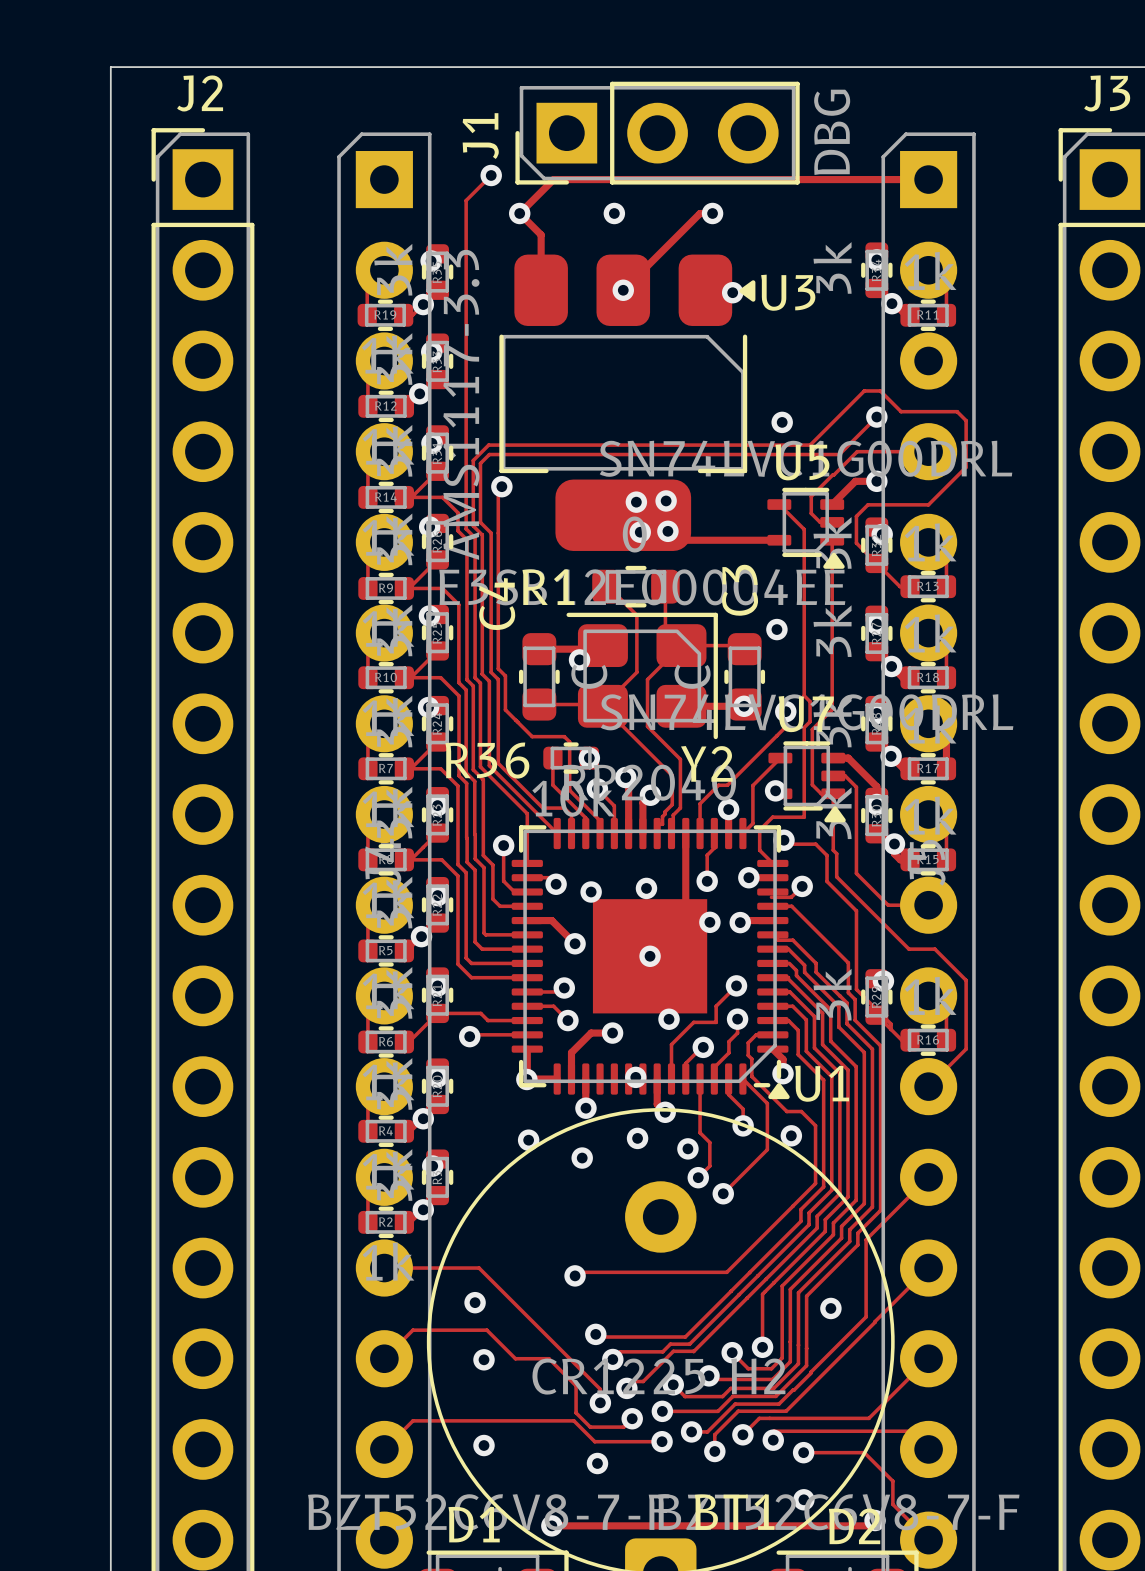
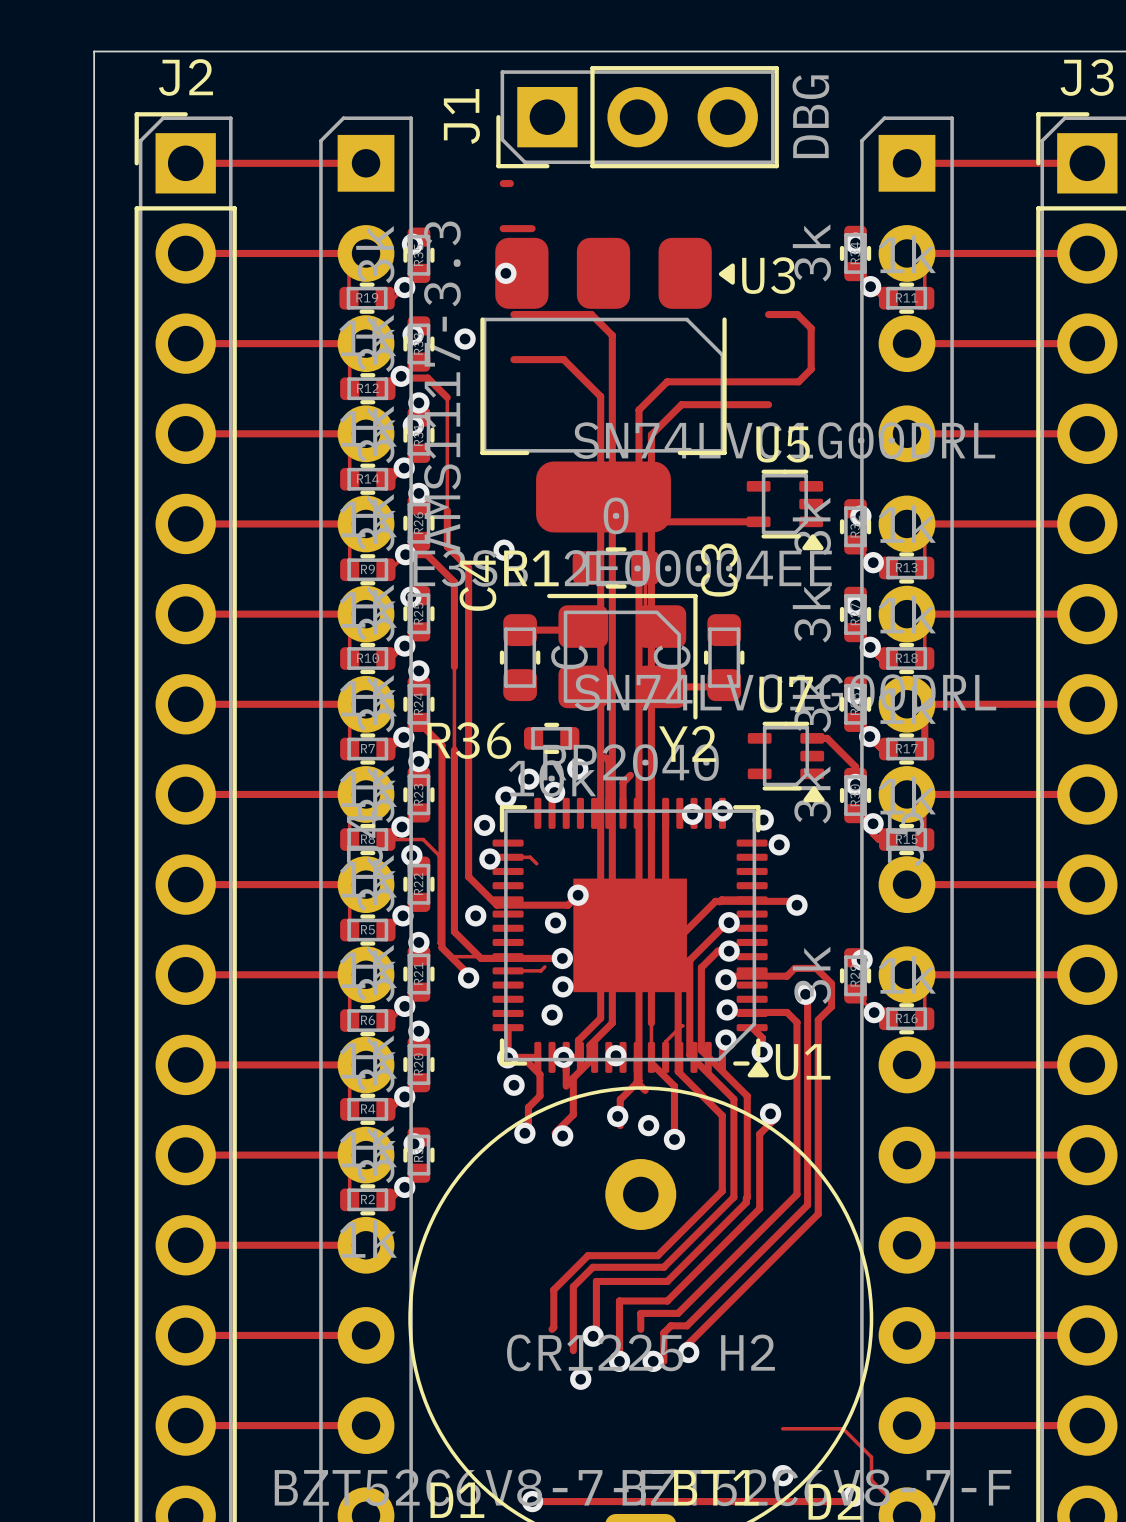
track: (491, 175) (466, 200) (466, 415) -> (402, 378) (427, 378) (447, 397)
via: (491, 175) -> none
track: none -> (185, 163) (366, 163)
track: (928, 179) (553, 179) (519, 213) (541, 234) (541, 290) -> (907, 163) (1087, 163)
track: none -> (503, 183) (510, 183)
via: (519, 213) -> none
via: (614, 213) -> none
track: (712, 213) (700, 213) (623, 290) -> none
via: (712, 213) -> none
track: none -> (503, 228) (532, 228)
track: none -> (185, 253) (366, 253)
track: none -> (907, 253) (1087, 253)
via: none -> (505, 273)
via: (623, 290) -> none
via: (732, 292) -> none
track: none -> (513, 314) (591, 314) (612, 335) (612, 1023) (590, 1045) (590, 1061) (573, 1077) (573, 1114) (555, 1133)
track: none -> (768, 314) (797, 314) (811, 328) (811, 369) (798, 381) (667, 381) (639, 410) (639, 1080) (620, 1099) (620, 1125)
via: none -> (465, 339)
track: none -> (185, 343) (366, 343)
track: none -> (907, 343) (1087, 343)
track: none -> (513, 359) (563, 359) (600, 396) (600, 1018) (578, 1040) (578, 1056) (563, 1057)
track: (876, 417) (839, 454) (489, 454) (480, 463) (480, 522) (491, 533) (491, 672) (498, 679) (498, 763) (542, 808) (564, 808) (571, 815) (571, 833) -> none
via: (876, 417) -> none
via: none -> (418, 402)
via: (782, 422) -> none
track: none -> (185, 433) (366, 433)
track: (928, 451) (857, 451) (811, 496) (811, 513) (820, 522) (832, 522) -> (907, 433) (1087, 433)
track: (876, 481) (855, 481) (832, 504) -> none
via: (876, 481) -> none
via: none -> (404, 468)
track: (501, 486) (498, 490) (498, 668) (505, 675) (505, 709) (532, 736) (564, 736) (569, 741) (569, 790) (600, 820) (600, 833) -> none
via: (501, 486) -> none
track: (411, 497) (442, 497) (457, 512) (457, 530) (466, 539) (466, 679) (473, 686) -> (405, 554) (426, 554) (454, 582) (454, 666)
via: (666, 500) -> none
via: (636, 502) -> none
track: (779, 504) (804, 529) (804, 695) (810, 701) (810, 721) (804, 727) (804, 817) (772, 817) (759, 830) (759, 850) (772, 863) -> none
via position: (429, 527) -> (418, 493)
track: (466, 528) (475, 537) (475, 677) (480, 683) (480, 766) (527, 813) (527, 863) -> (447, 510) (447, 546) (468, 567) (468, 876) (496, 905) (568, 905) (578, 895)
via: (667, 531) -> none
via: (640, 532) -> none
track: (832, 540) (832, 709) (812, 729) (812, 784) (821, 793) (833, 793) (833, 850) (836, 853) (836, 876) (908, 949) (934, 949) (966, 980) (966, 1049) (928, 1086) -> (1087, 1064) (907, 1064)
track: none -> (185, 523) (366, 523)
track: none -> (907, 523) (1087, 523)
track: (876, 563) (856, 543) (856, 516) (867, 504) (928, 504) (966, 467) (966, 420) (957, 411) (901, 411) (880, 390) (864, 390) (810, 445) (488, 445) (473, 460) (473, 525) (482, 534) (482, 674) (489, 681) (489, 765) (557, 833) -> none
via: none -> (504, 550)
via: none -> (405, 554)
via: none -> (873, 562)
track: (606, 584) (636, 615) (636, 672) (602, 706) -> none
track: (409, 588) (442, 588) (458, 604) (458, 682) (466, 689) (466, 772) (474, 781) (474, 834) -> none
via: (776, 629) -> none
track: none -> (185, 614) (366, 614)
track: none -> (907, 614) (1087, 614)
track: (744, 649) (741, 645) (681, 645) (647, 679) (647, 726) (680, 759) (680, 808) (673, 815) (673, 831) (671, 833) -> none
via: (579, 659) -> none
via: none -> (404, 646)
track: (410, 677) (440, 677) (459, 695) (459, 775) (466, 783) (466, 837) -> none
track: (539, 704) (601, 704) (672, 775) (672, 804) (662, 816) (662, 824) (657, 824) (657, 833) -> none
via: (744, 706) -> none
via position: (428, 707) -> (418, 670)
track: (785, 711) (785, 726) (727, 785) (718, 785) (700, 803) (700, 833) -> none
via: (785, 711) -> none
track: none -> (185, 704) (366, 704)
track: none -> (907, 704) (1087, 704)
track: none -> (418, 722) (441, 745) (441, 947) (468, 974) (468, 977)
via: none -> (403, 737)
track: (552, 758) (552, 785) (585, 817) (585, 833) -> none
via: (589, 758) -> none
track: (780, 758) (752, 785) (752, 823) (742, 833) -> none
track: (410, 768) (440, 768) (457, 785) (457, 864) (466, 872) (466, 958) (471, 963) (527, 963) -> none
track: (473, 769) (483, 779) (483, 855) (492, 865) (492, 899) (500, 906) (527, 906) -> (454, 750) (454, 931) (481, 958) (562, 958)
track: (833, 775) (845, 775) (856, 787) (856, 873) (888, 905) (928, 905) -> (1087, 884) (907, 884)
via: (625, 777) -> none
via: none -> (418, 761)
track: (597, 788) (614, 805) (614, 833) -> none
via: (775, 790) -> none
via: (650, 795) -> none
via: none -> (528, 779)
via: (437, 805) -> none
via: (728, 809) -> none
via: none -> (554, 792)
track: none -> (185, 794) (366, 794)
track: none -> (907, 794) (1087, 794)
via: none -> (505, 796)
via: none -> (722, 810)
track: (714, 833) (714, 848) (707, 855) (707, 881) -> none
track: (475, 834) (475, 858) (484, 867) (484, 933) (485, 934) (527, 934) -> none
via: none -> (692, 814)
track: (467, 838) (467, 862) (475, 870) (475, 941) (482, 949) (527, 949) -> none
track: (783, 840) (789, 844) (815, 844) (827, 855) (827, 881) (856, 910) (856, 989) (891, 1024) (891, 1029) -> none
track: (503, 845) (503, 881) (514, 892) (527, 892) -> none
via: none -> (401, 827)
via: (748, 877) -> none
via: none -> (489, 859)
via: (707, 881) -> none
via: (556, 884) -> none
track: (802, 886) (791, 897) (771, 897) -> none
via position: (802, 886) -> (779, 844)
via: (646, 888) -> none
via position: (591, 892) -> (578, 895)
via position: (437, 895) -> (411, 855)
track: none -> (185, 884) (366, 884)
track: (772, 906) (791, 906) (848, 962) (848, 992) (855, 999) (855, 1020) (880, 1045) (880, 1210) (857, 1233) (857, 1244) (806, 1296) (806, 1365) (775, 1396) (732, 1396) (717, 1411) (662, 1411) -> none
track: (527, 920) (551, 920) (575, 943) -> none
via: (709, 922) -> none
via position: (740, 922) -> (729, 922)
track: none -> (796, 905) (793, 901) (715, 901) (679, 937) (678, 1071) (722, 1115) (722, 1191) (657, 1255) (588, 1255) (553, 1289) (553, 1327) (552, 1329)
via: none -> (796, 905)
track: (772, 934) (778, 940) (792, 940) (816, 963) (816, 972) (847, 1002) (847, 1023) (872, 1049) (872, 1207) (849, 1229) (849, 1241) (798, 1292) (798, 1363) (773, 1388) (730, 1388) (722, 1396) (685, 1396) (673, 1384) -> none
via: none -> (475, 915)
track: none -> (729, 922) (689, 960) (689, 1055) (733, 1099) (733, 1197) (663, 1267) (592, 1267) (573, 1286) (573, 1350)
track: (772, 949) (788, 949) (804, 965) (804, 972) (838, 1006) (838, 1027) (864, 1052) (864, 1203) (841, 1226) (841, 1238) (790, 1289) (790, 1361) (772, 1379) (712, 1379) (708, 1375) (714, 1372) -> none
via: (650, 956) -> none
via: none -> (418, 942)
track: (789, 963) (796, 970) (796, 975) (830, 1009) (830, 1041) (856, 1066) (856, 1200) (833, 1223) (833, 1234) (782, 1286) (782, 1358) (771, 1368) (748, 1368) (732, 1352) -> none
track: none -> (729, 951) (717, 951) (701, 967) (701, 1050) (747, 1096) (746, 1202) (667, 1281) (596, 1281) (596, 1329)
via: none -> (729, 951)
track: (787, 977) (822, 1013) (822, 1044) (848, 1070) (848, 1196) (825, 1219) (825, 1231) (762, 1294) (762, 1347) -> none
via: none -> (562, 958)
via: (437, 985) -> none
track: (736, 985) (716, 1006) (716, 1022) (693, 1022) (671, 1044) -> (768, 404) (681, 404) (651, 434) (651, 1023)
via: (736, 985) -> none
via: (564, 988) -> none
track: (772, 991) (789, 991) (814, 1016) (814, 1047) (839, 1073) (839, 1193) (817, 1216) (817, 1228) (693, 1351) -> none
track: none -> (185, 974) (366, 974)
track: none -> (907, 974) (1087, 974)
via: none -> (468, 977)
track: none -> (725, 979) (729, 976) (787, 976) (794, 968) (816, 968) (831, 983) (831, 1006) (818, 1019) (818, 1214) (686, 1345) (686, 1351)
via: none -> (725, 979)
track: (527, 1006) (553, 1006) (567, 1020) -> none
track: (772, 1006) (792, 1006) (806, 1019) (806, 1051) (831, 1076) (831, 1190) (809, 1212) (809, 1224) (689, 1344) (670, 1344) (662, 1351) (620, 1351) (612, 1359) -> none
via: none -> (562, 986)
track: (437, 1013) (480, 1013) (487, 1020) (527, 1020) -> none
track: none -> (805, 994) (807, 996) (807, 1205) (686, 1325) (670, 1325) (663, 1332) (663, 1361)
via: none -> (805, 994)
via: (669, 1019) -> none
track: (737, 1019) (737, 1033) (728, 1041) (728, 1052) (714, 1067) (714, 1079) -> none
via: (737, 1019) -> none
via: (567, 1020) -> none
track: (772, 1020) (788, 1020) (798, 1030) (798, 1054) (823, 1080) (823, 1186) (800, 1209) (800, 1221) (685, 1337) (598, 1337) (595, 1334) -> none
via: none -> (404, 1006)
track: none -> (727, 1009) (729, 1012) (787, 1012) (796, 1022) (796, 1194) (678, 1313) (640, 1313) (640, 1329)
via: none -> (727, 1009)
track: (612, 1033) (591, 1033) (571, 1052) (571, 1079) -> none
via: (612, 1033) -> none
via: none -> (874, 1012)
track: (527, 1034) (471, 1034) (469, 1036) -> none
track: (772, 1034) (756, 1034) (748, 1042) (748, 1055) (751, 1059) (751, 1076) (786, 1111) (801, 1111) (815, 1125) (815, 1183) (726, 1272) (578, 1272) (575, 1275) -> none
via: (469, 1036) -> none
via: none -> (552, 1015)
via: (703, 1047) -> none
via: none -> (418, 1031)
via: none -> (725, 1040)
via: (437, 1076) -> none
via: none -> (563, 1057)
track: none -> (651, 1057) (651, 1063) (674, 1086) (674, 1139)
track: (700, 1079) (700, 1132) (709, 1142) (709, 1166) (698, 1177) -> none
track: (728, 1079) (728, 1094) (743, 1109) (743, 1125) -> none
track: (742, 1079) (767, 1103) (767, 1149) (723, 1193) -> none
track: none -> (528, 1062) (539, 1074) (539, 1095) (528, 1107) (528, 1129) (524, 1133)
track: none -> (185, 1064) (366, 1064)
via: none -> (514, 1085)
via: (585, 1108) -> none
via: (665, 1112) -> none
via: (743, 1125) -> none
via position: (528, 1140) -> (524, 1133)
track: none -> (775, 1118) (759, 1134) (759, 1208) (667, 1300) (619, 1300) (619, 1350)
via: none -> (648, 1125)
via: (687, 1148) -> none
via: none -> (674, 1139)
track: none -> (185, 1155) (366, 1155)
via: (698, 1177) -> none
track: (928, 1177) (866, 1239) (866, 1316) (778, 1404) (735, 1404) (707, 1431) (691, 1431) -> (907, 1155) (1087, 1155)
via: (723, 1193) -> none
track: (384, 1268) (479, 1268) (600, 1389) (600, 1402) -> (366, 1245) (185, 1245)
track: (928, 1268) (875, 1321) -> (907, 1245) (1087, 1245)
via: (575, 1275) -> none
via: (475, 1302) -> none
via: (830, 1308) -> none
track: (875, 1322) (786, 1411) (738, 1411) (714, 1434) (714, 1451) -> none
via: (595, 1334) -> none
via: (762, 1347) -> none
track: (693, 1351) (673, 1351) (643, 1381) (633, 1381) (626, 1388) -> none
via: (732, 1352) -> none
track: (384, 1358) (412, 1330) (486, 1330) (515, 1358) (549, 1358) (576, 1385) (576, 1412) (590, 1427) (623, 1427) (632, 1418) (641, 1418) -> (366, 1335) (185, 1335)
track: (928, 1358) (868, 1418) (759, 1418) (742, 1434) -> (907, 1335) (1087, 1335)
via: (484, 1359) -> none
via position: (626, 1388) -> (619, 1361)
via: (662, 1411) -> none
via: (632, 1418) -> none
via: (691, 1431) -> none
via: (742, 1434) -> none
via: (773, 1440) -> none
track: (662, 1441) (594, 1441) (573, 1420) (412, 1420) (384, 1449) -> (185, 1425) (366, 1425)
via: (662, 1441) -> none
via: (484, 1445) -> none
track: (767, 1446) (767, 1437) (774, 1431) (910, 1431) (928, 1449) -> (1087, 1425) (907, 1425)
via: (714, 1451) -> none
via: (803, 1452) -> none
via: (597, 1463) -> none

